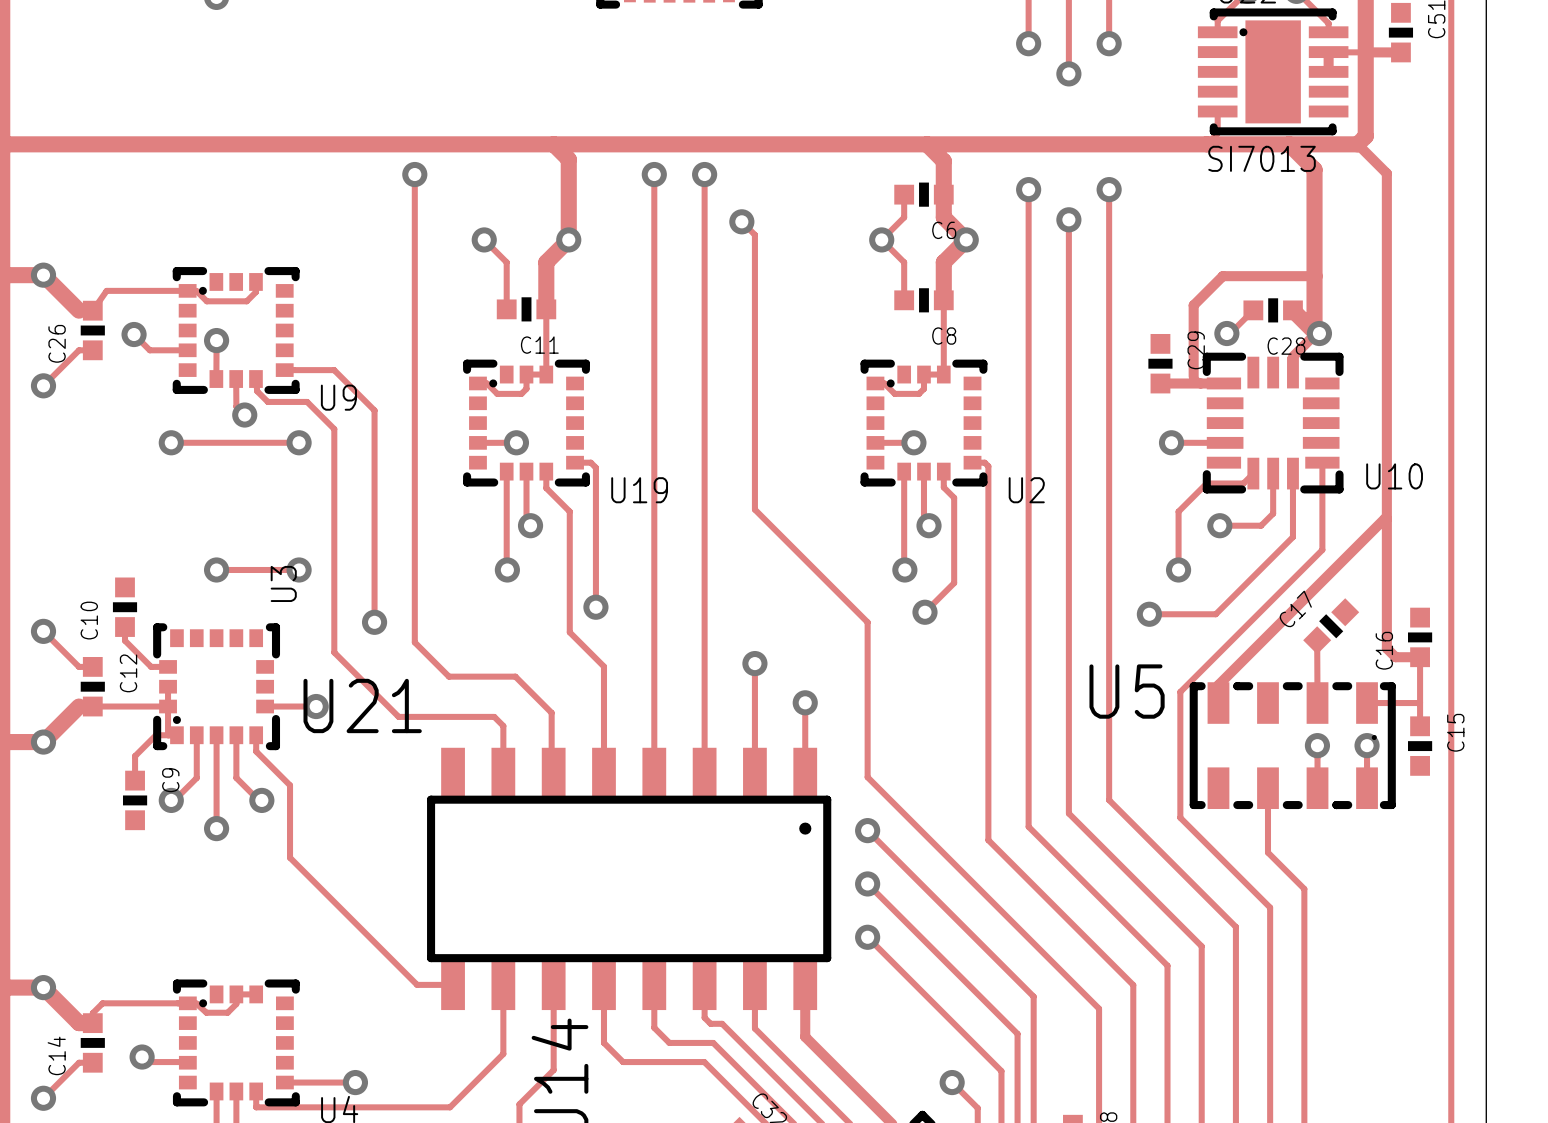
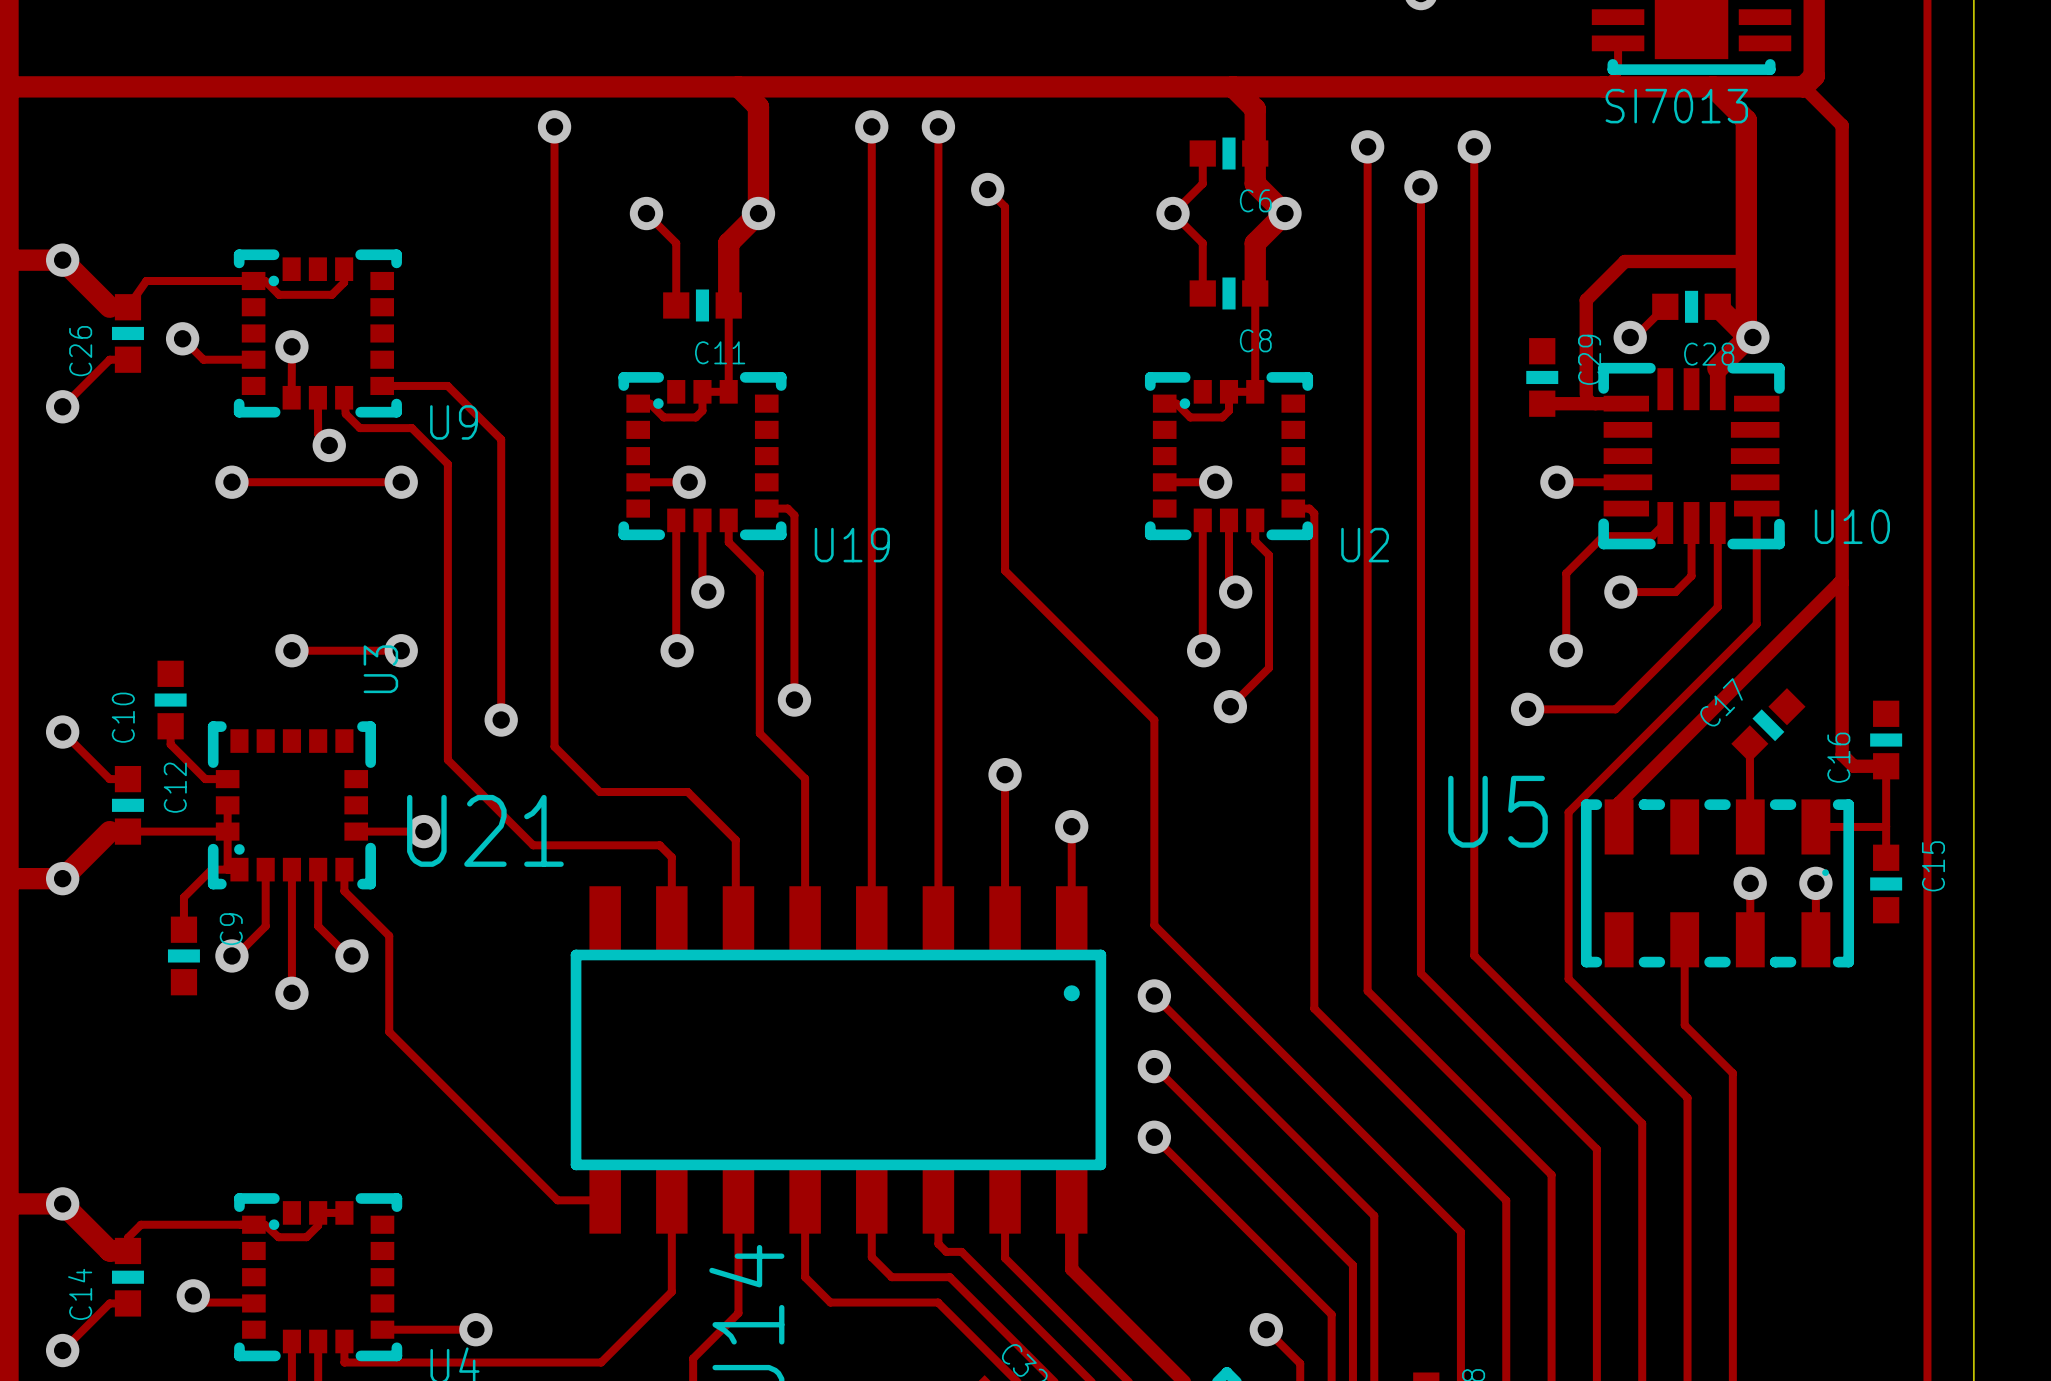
track width: thin (1316, 333) (1292, 356) -> thick (1748, 337) (1717, 368)

